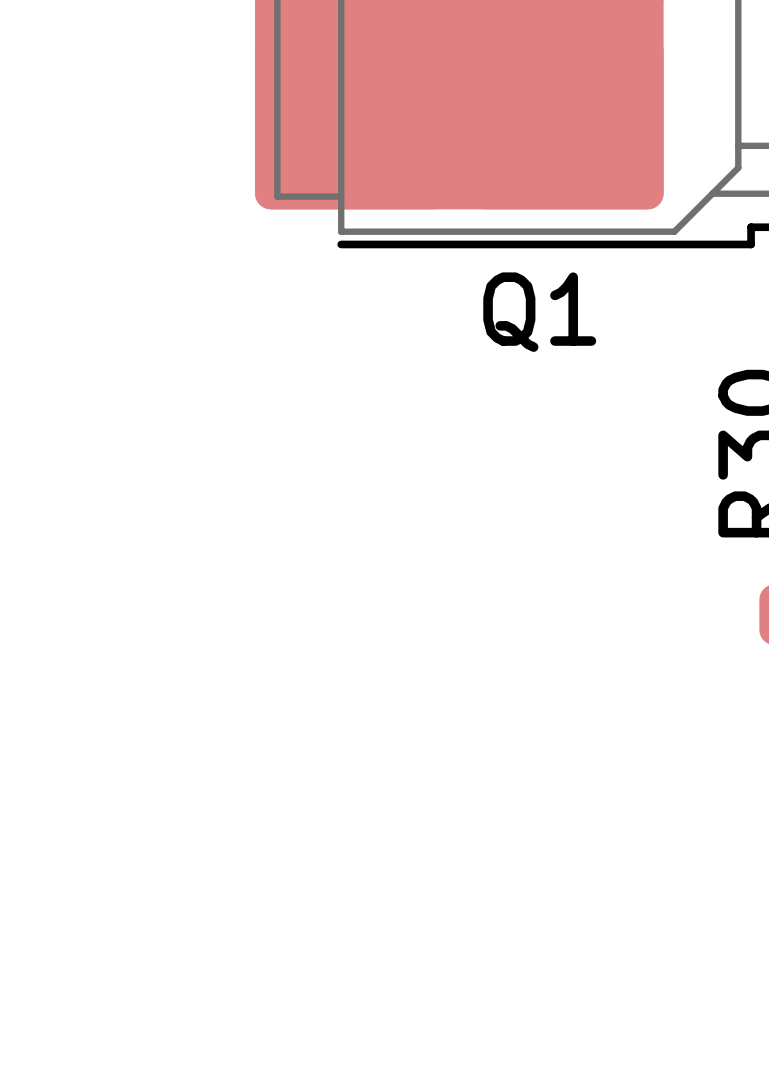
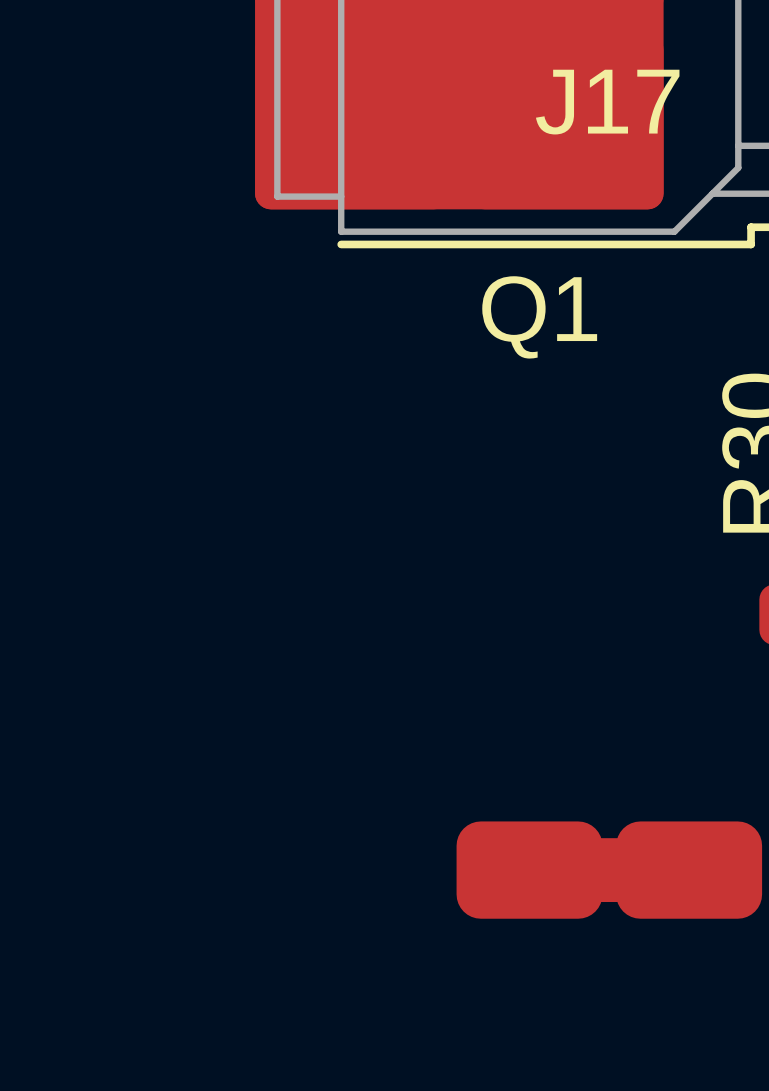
J17: none -> (609, 870)

